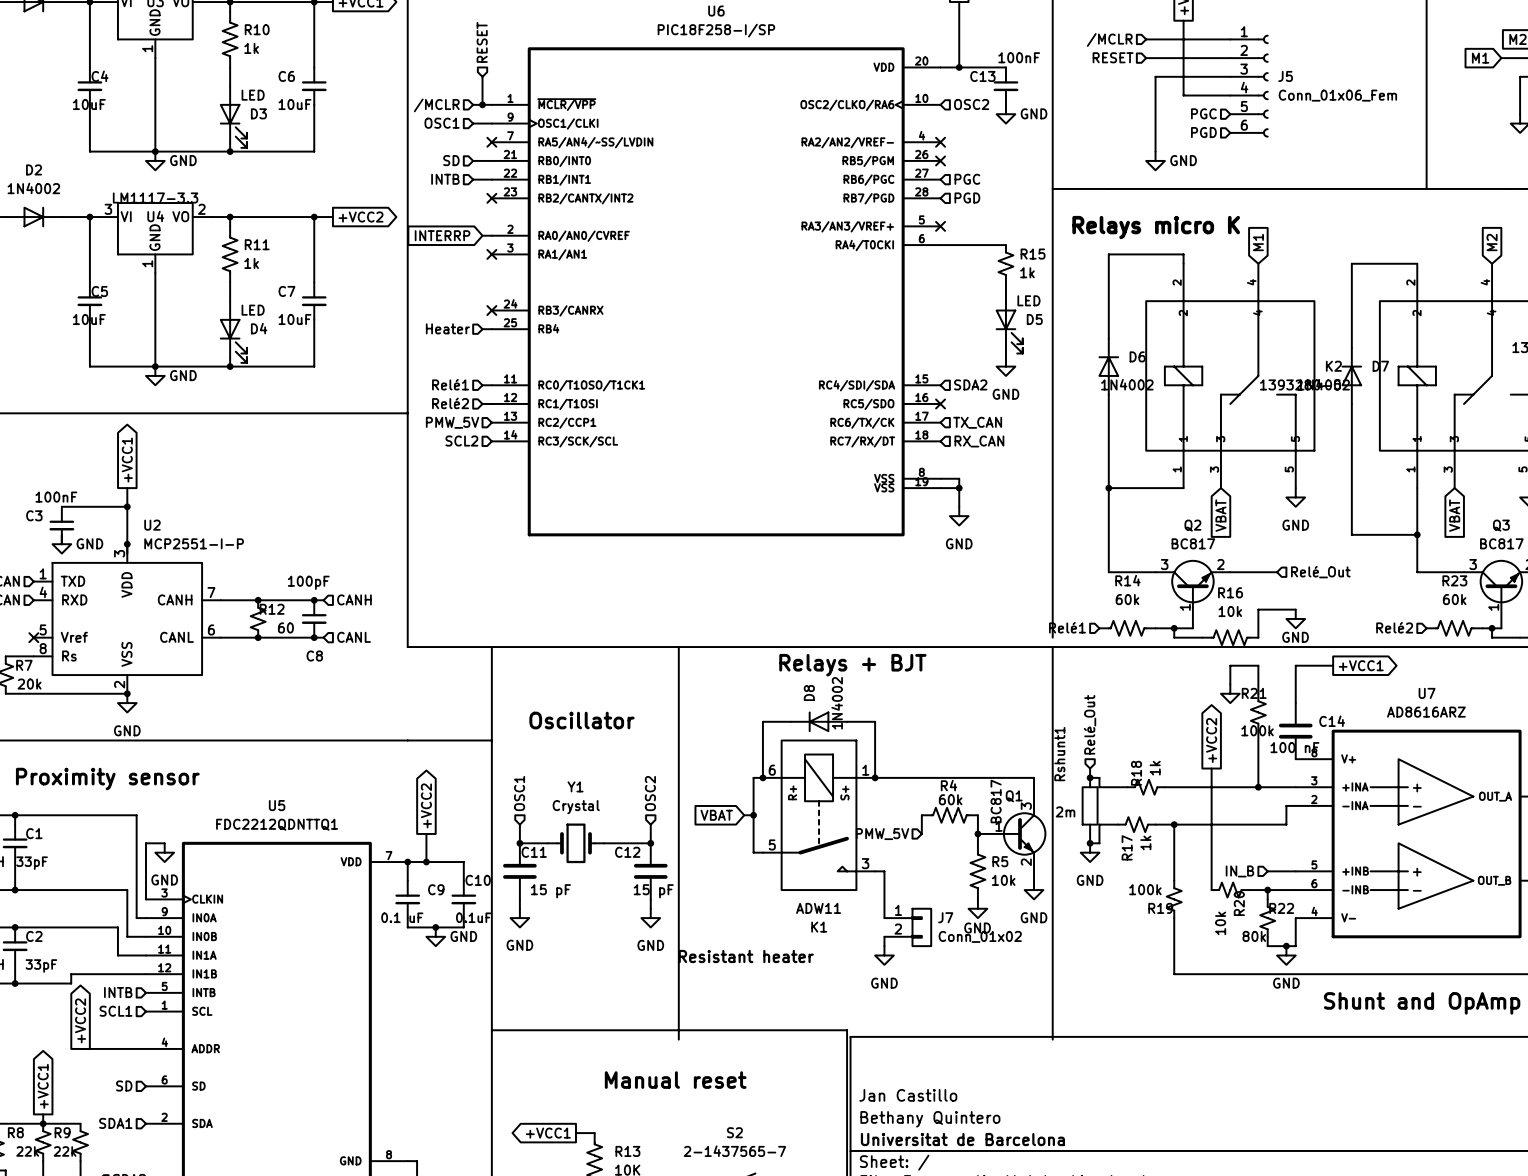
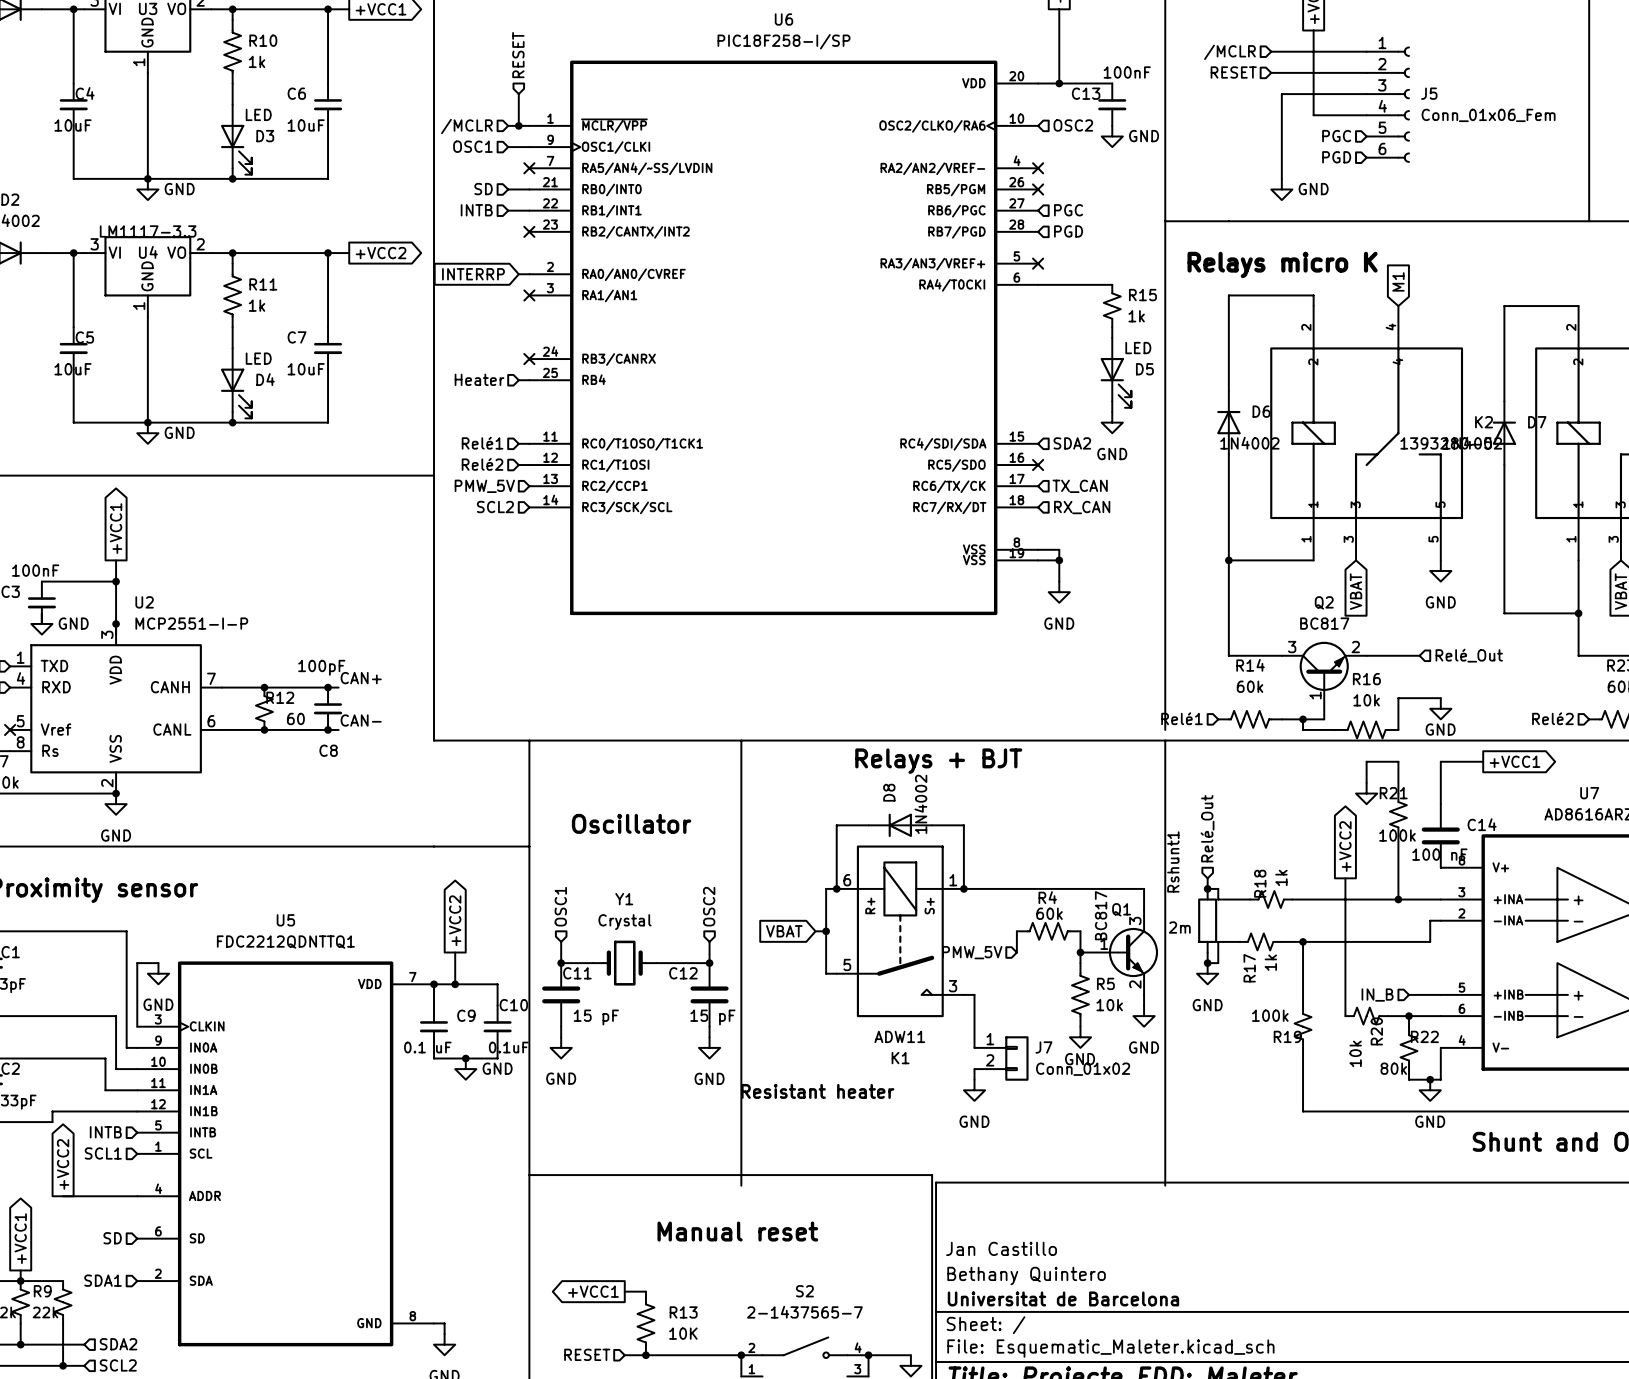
label: none -> CAN+ (361, 678)
hierarchical label: CANH (354, 599) -> none
label: none -> CAN- (361, 720)
hierarchical label: CANL (354, 637) -> none

